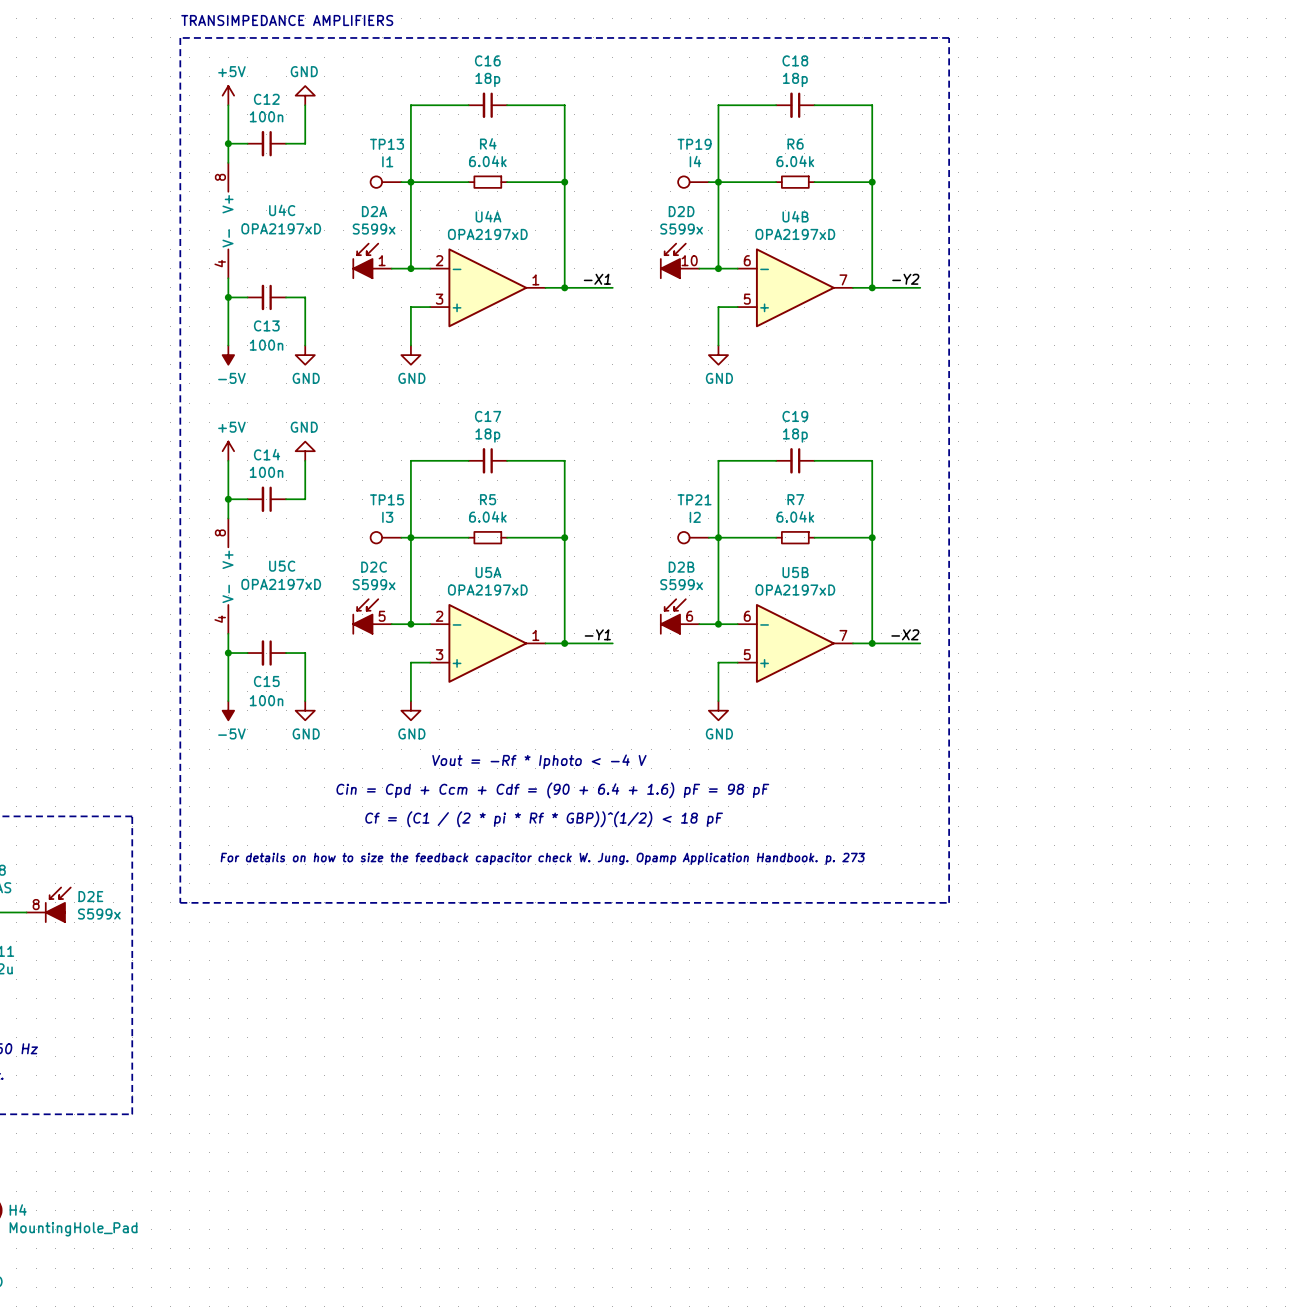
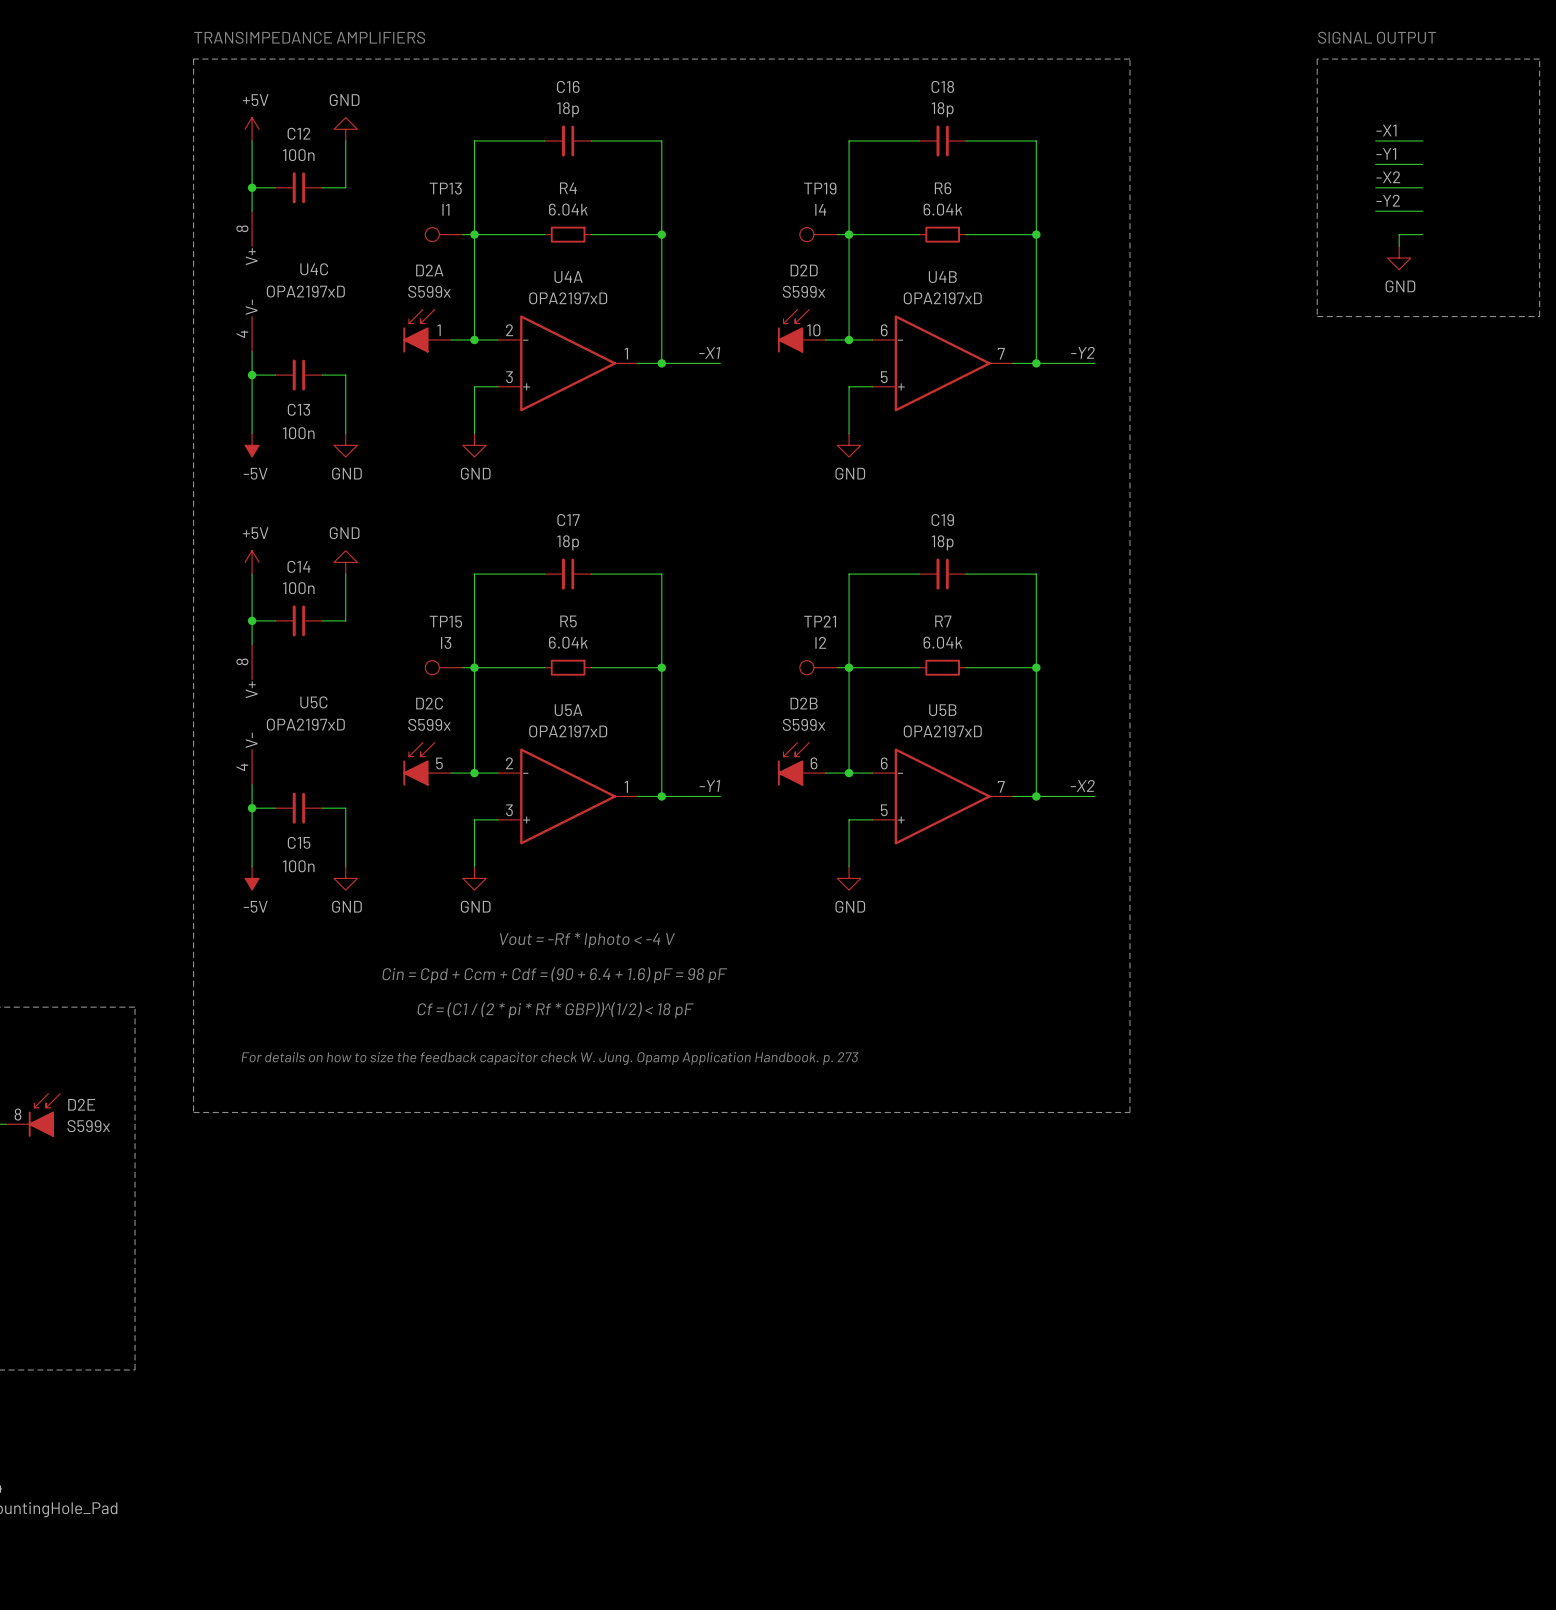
text: none -> SIGNAL OUTPUT (1377, 37)
line: none -> (1317, 59) (1539, 59) (1539, 316) (1317, 316) (1317, 59)
label: none -> -X1 (1386, 130)
wire: none -> (1375, 140) (1422, 140)
label: none -> -Y1 (1386, 153)
wire: none -> (1375, 164) (1422, 164)
label: none -> -X2 (1388, 177)
wire: none -> (1375, 187) (1422, 187)
label: none -> -Y2 (1388, 200)
wire: none -> (1375, 211) (1422, 211)
wire: none -> (1422, 234) (1399, 234) (1399, 246)
power symbol: none -> GND (1399, 258)

